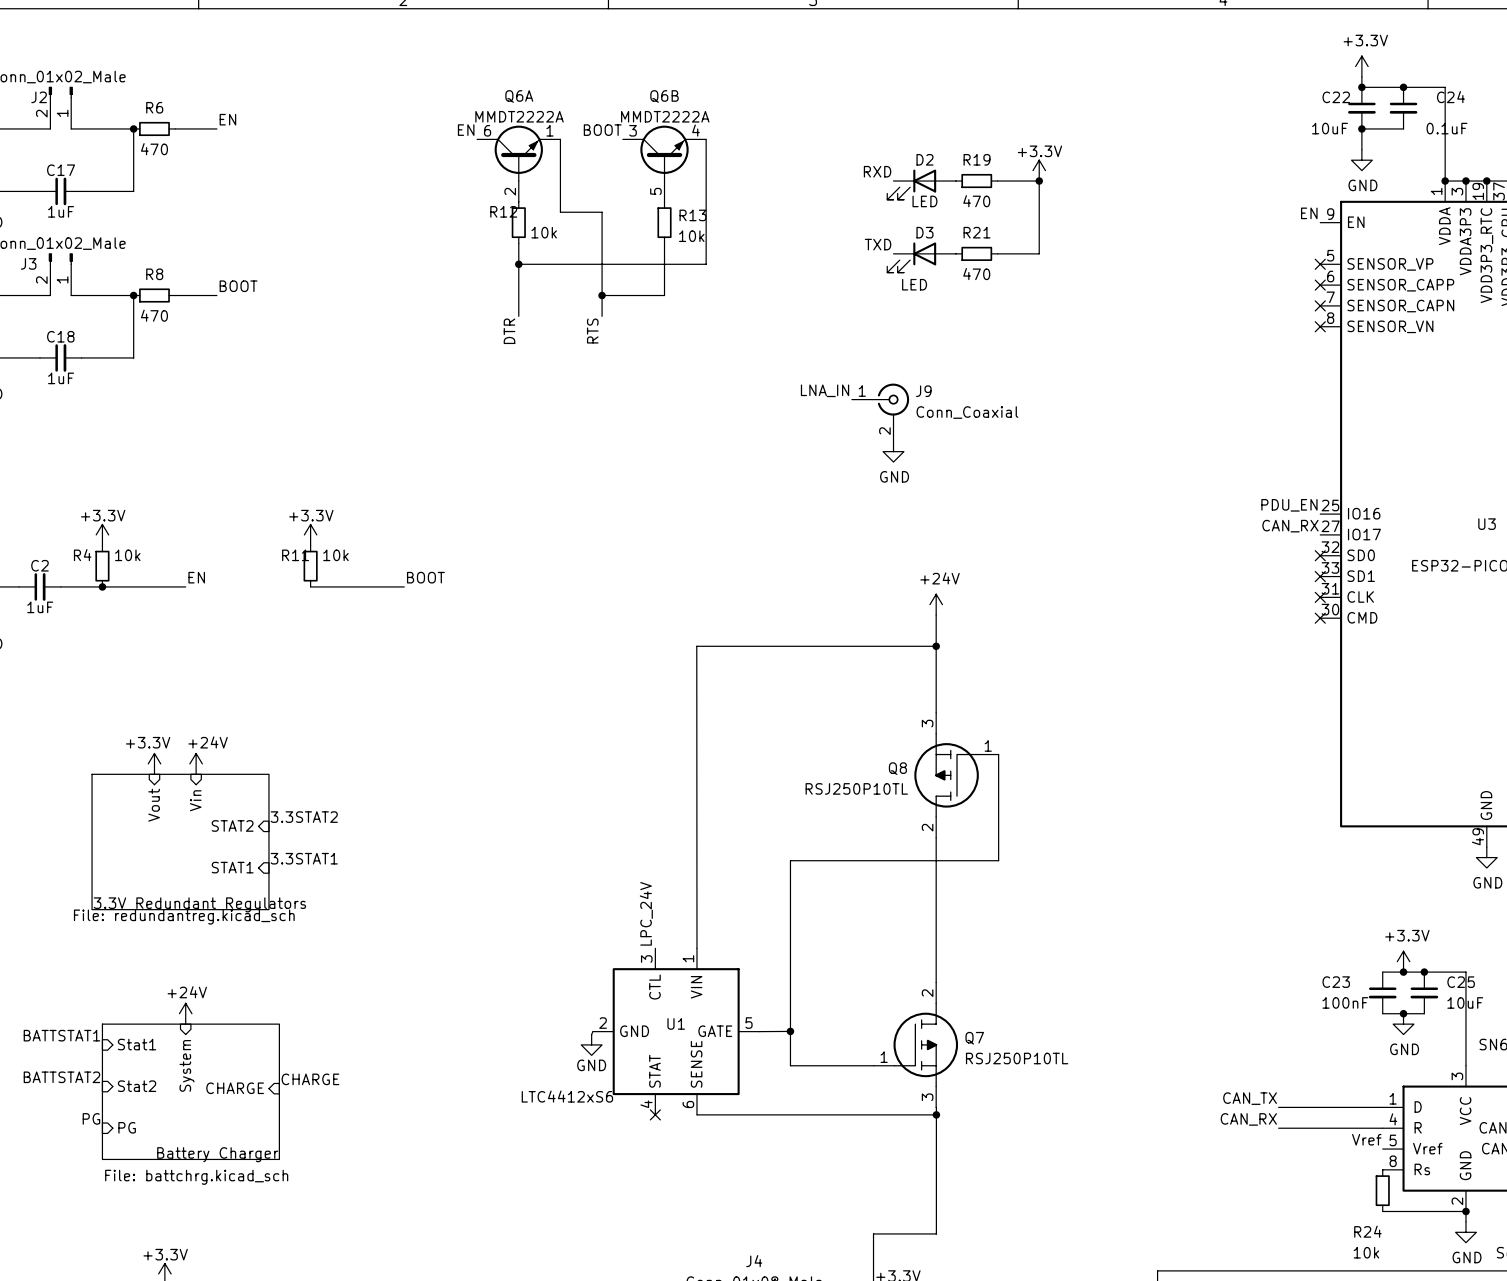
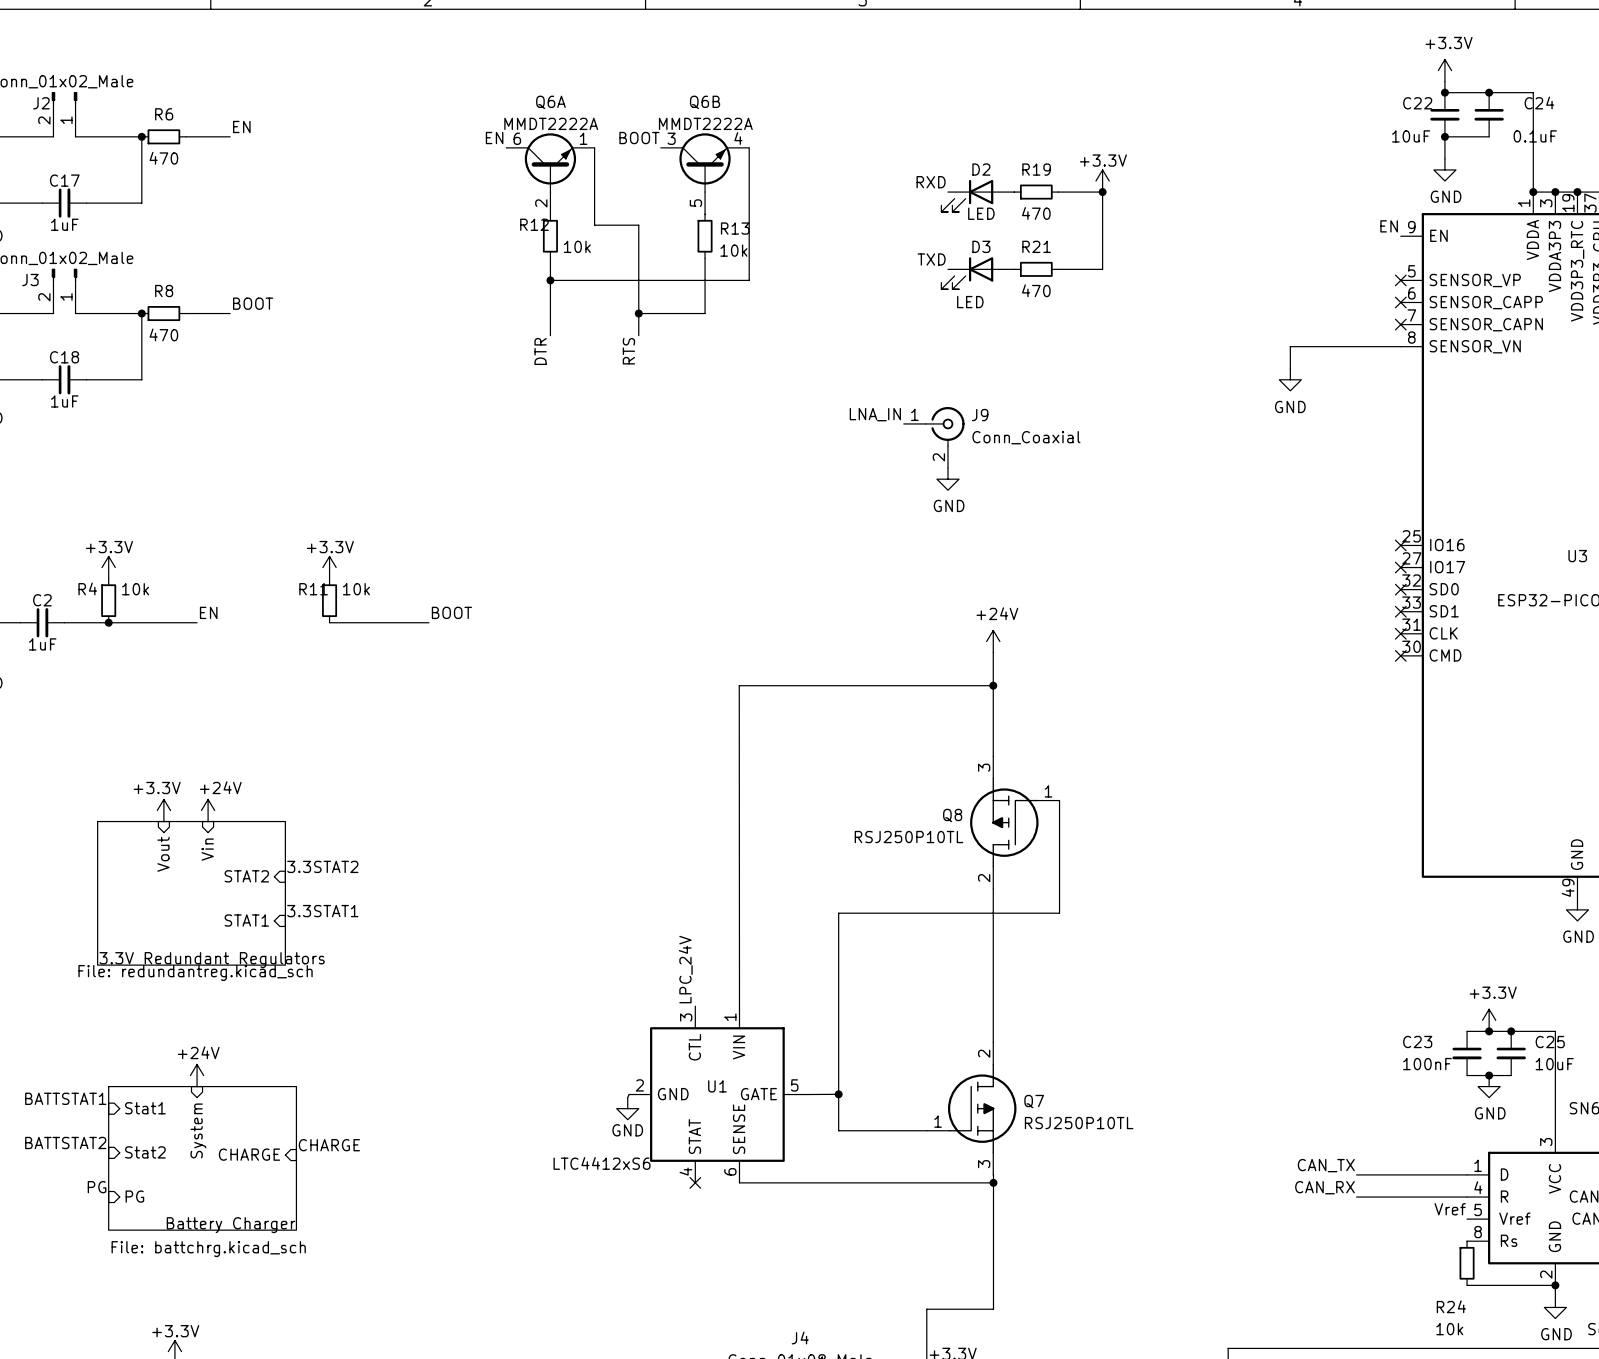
wire: none -> (1400, 346) (1290, 346) (1290, 368)
no-connect mark: (1320, 326) -> none
power symbol: none -> GND (1290, 379)
label: PDU_EN (1289, 505) -> none
no-connect mark: none -> (1400, 545)
label: CAN_RX (1290, 526) -> none
no-connect mark: none -> (1400, 567)

